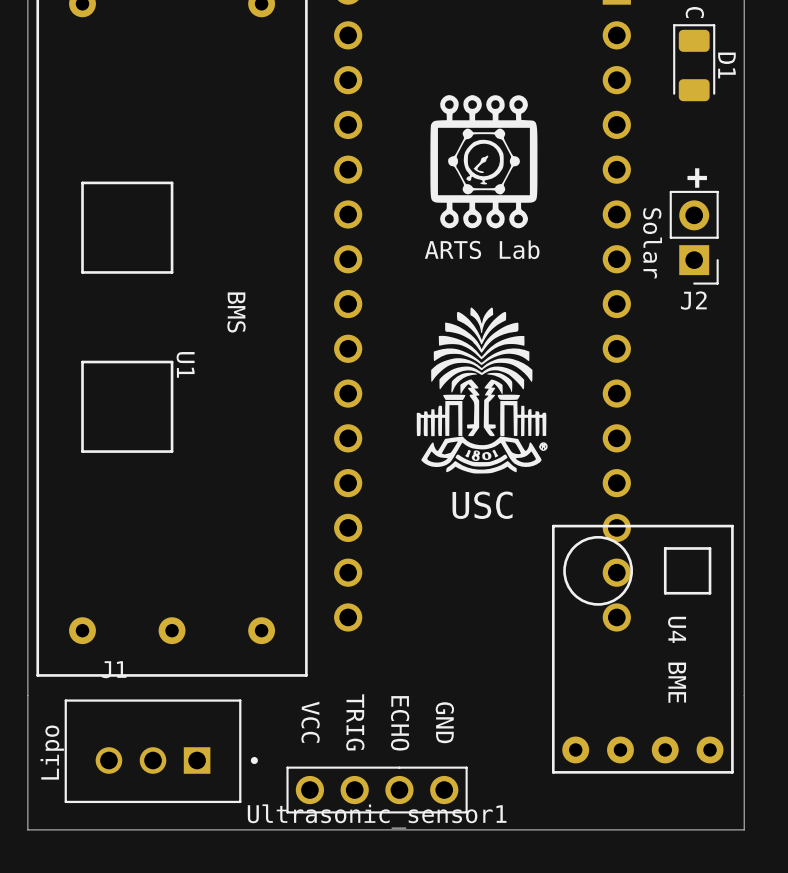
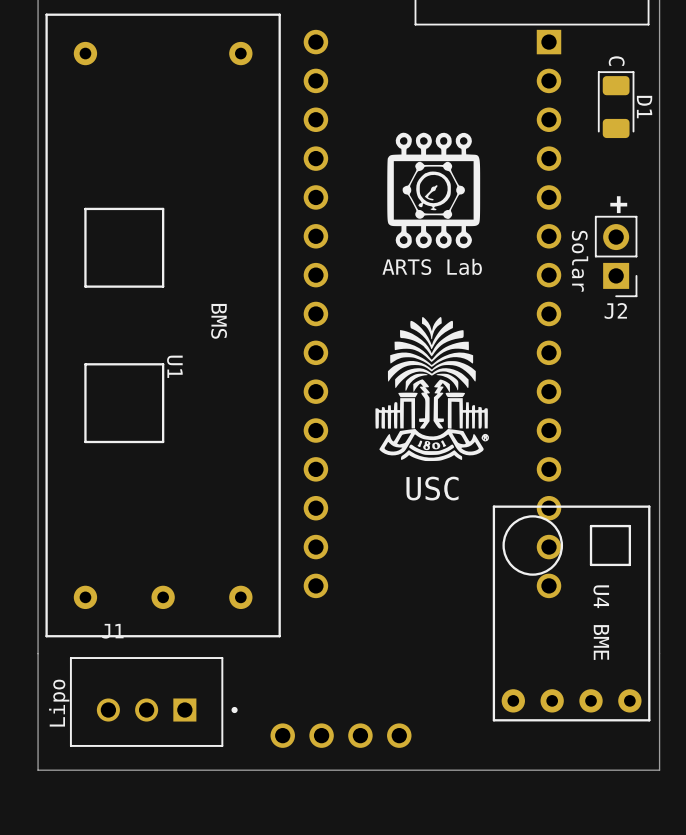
Ultrasonic_sensor1 side: bottom (377, 790) -> top (341, 735)

